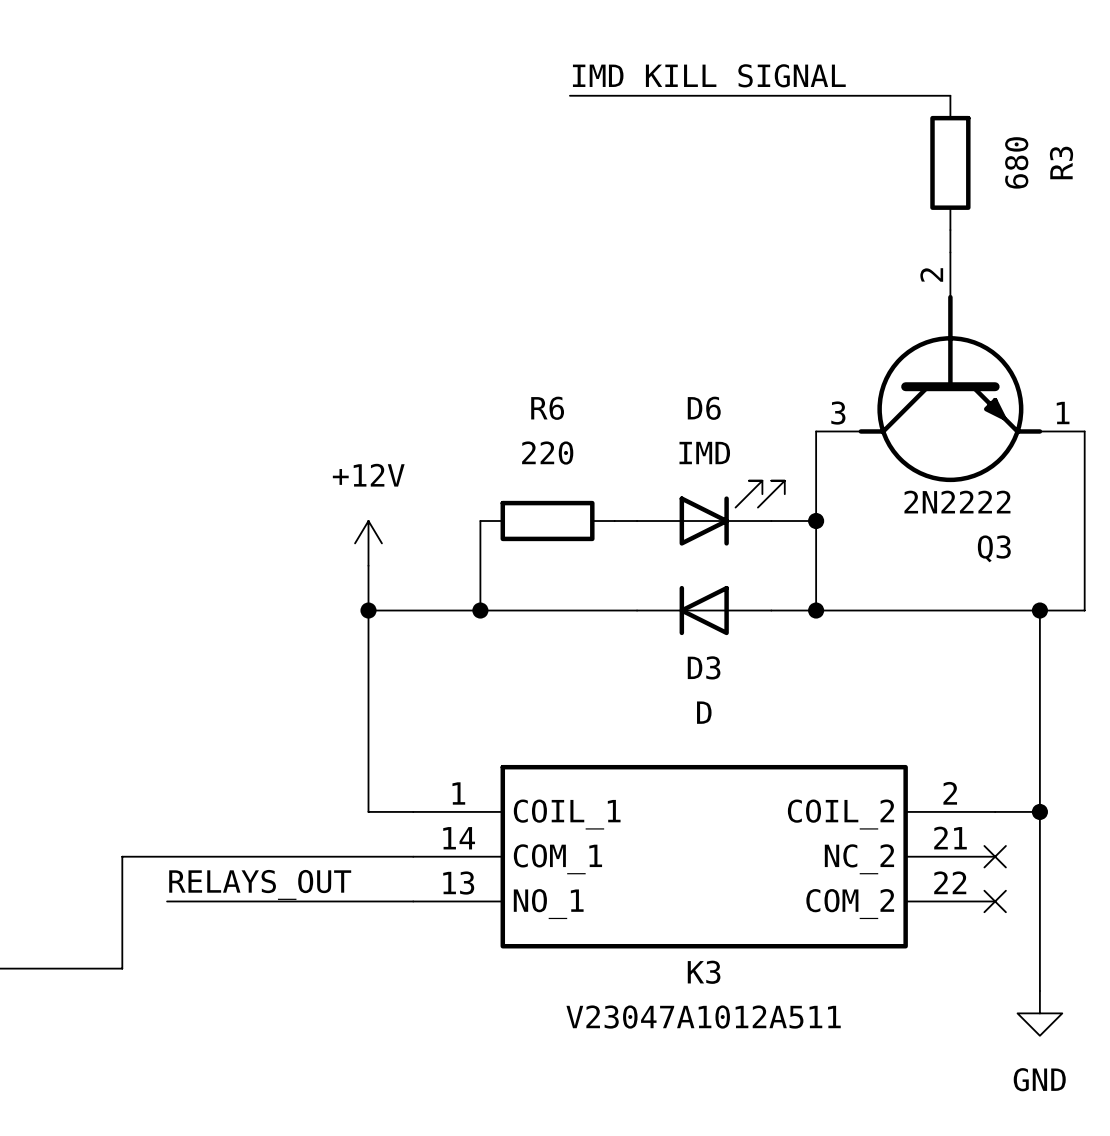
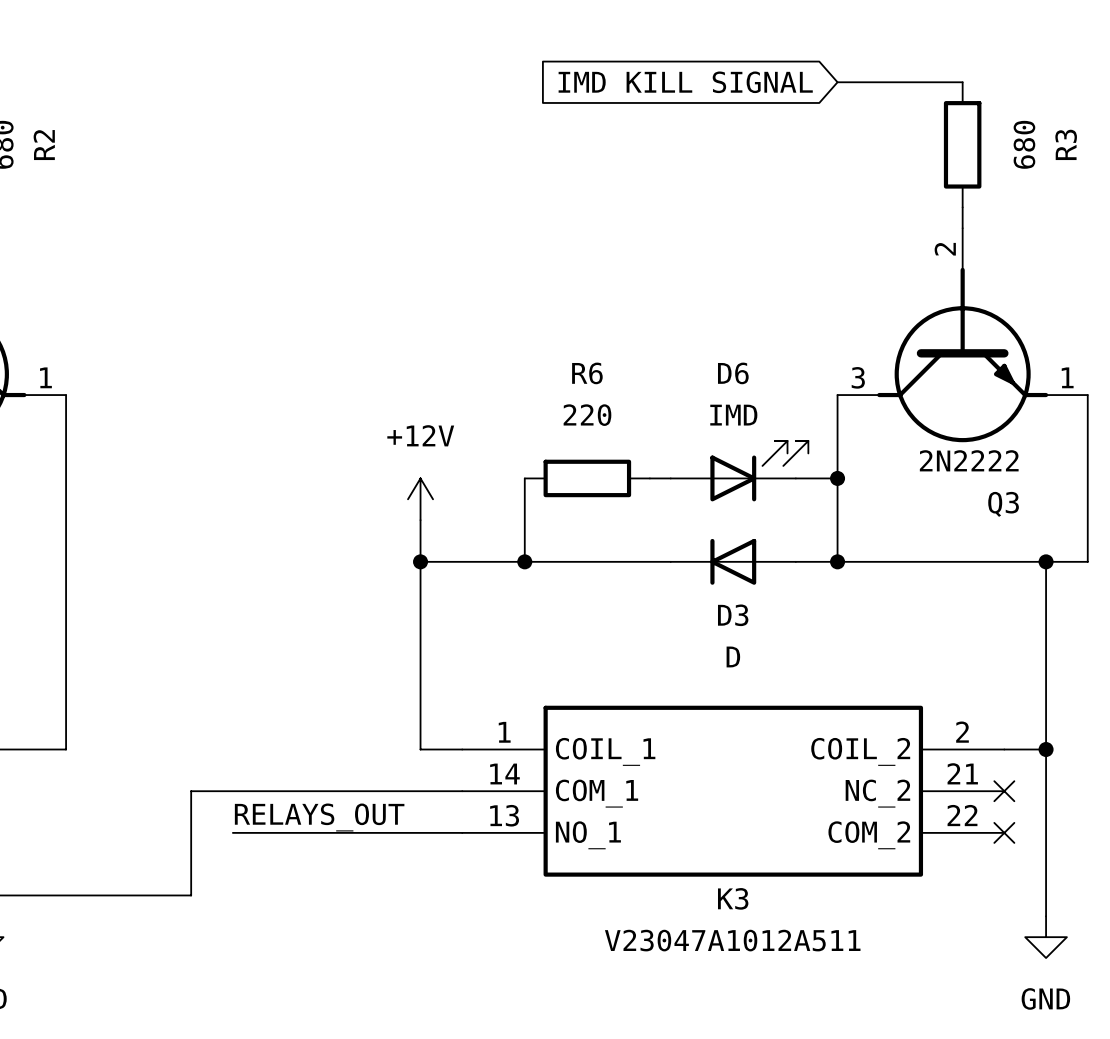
label: IMD KILL SIGNAL (709, 75) -> none
wire: (569, 95) (816, 95) -> none
global label: none -> IMD KILL SIGNAL (685, 82)

